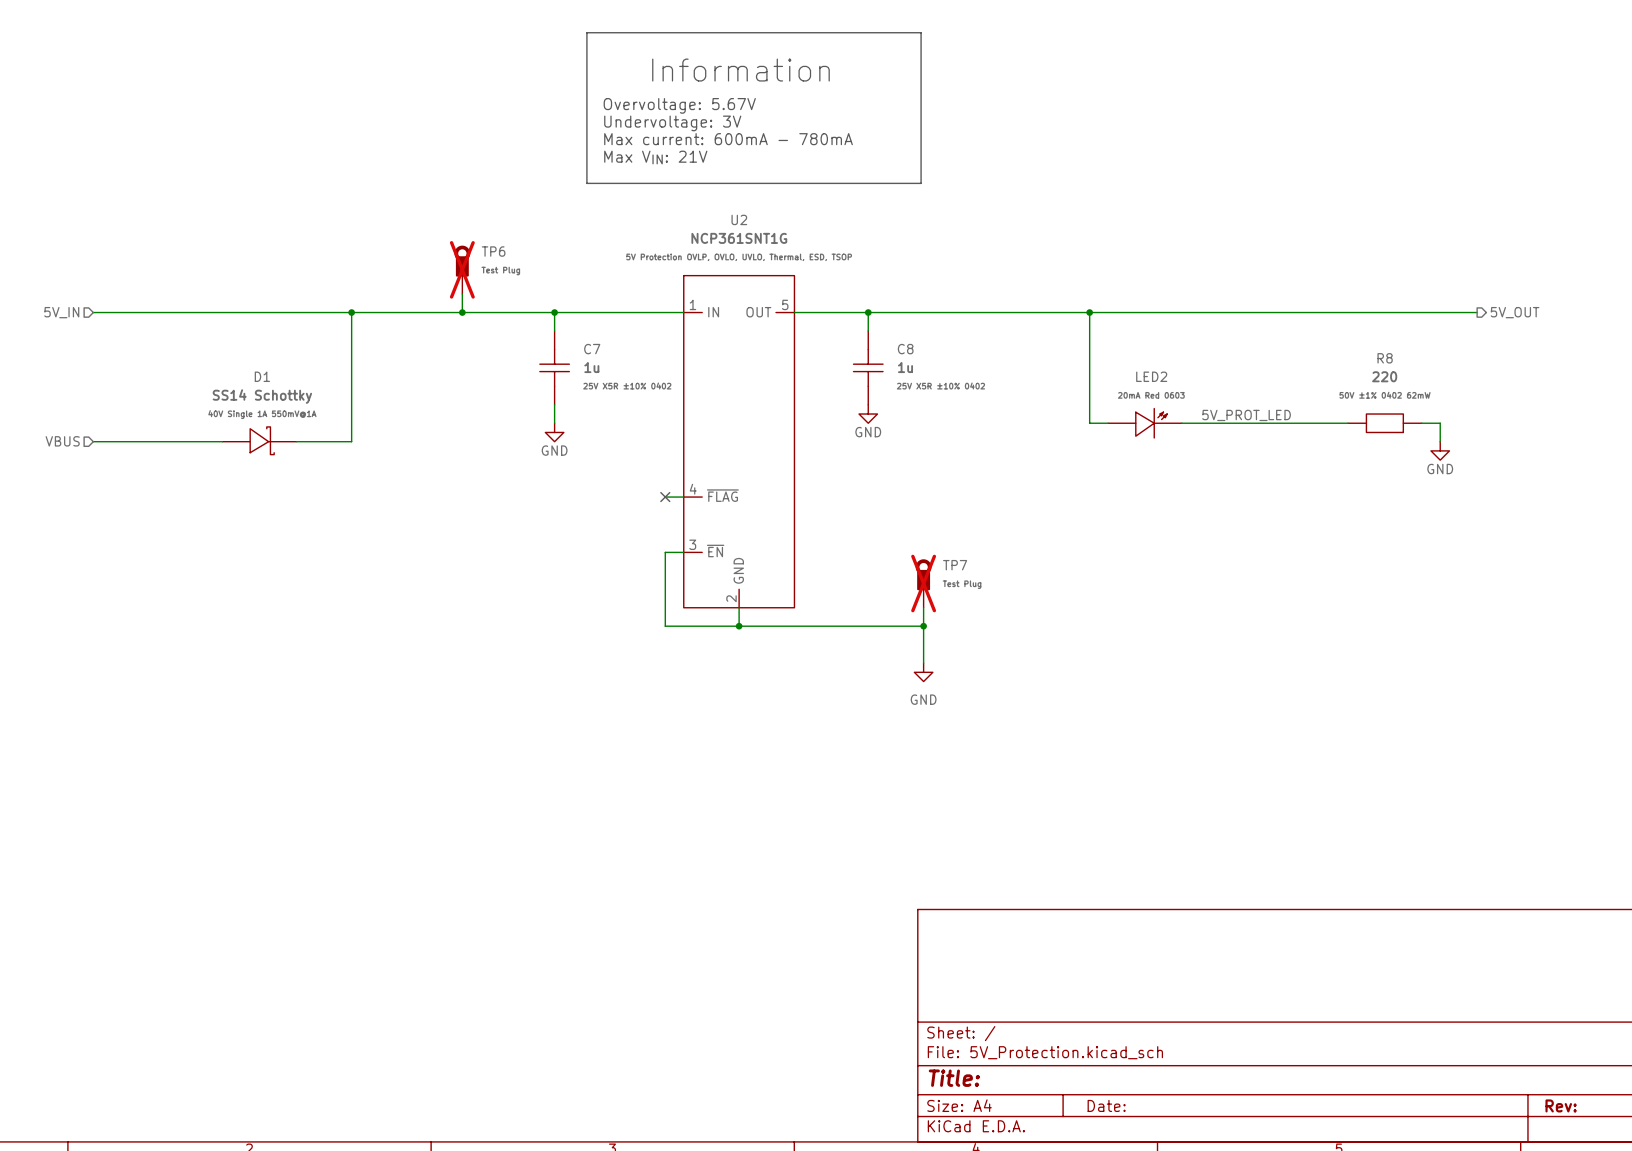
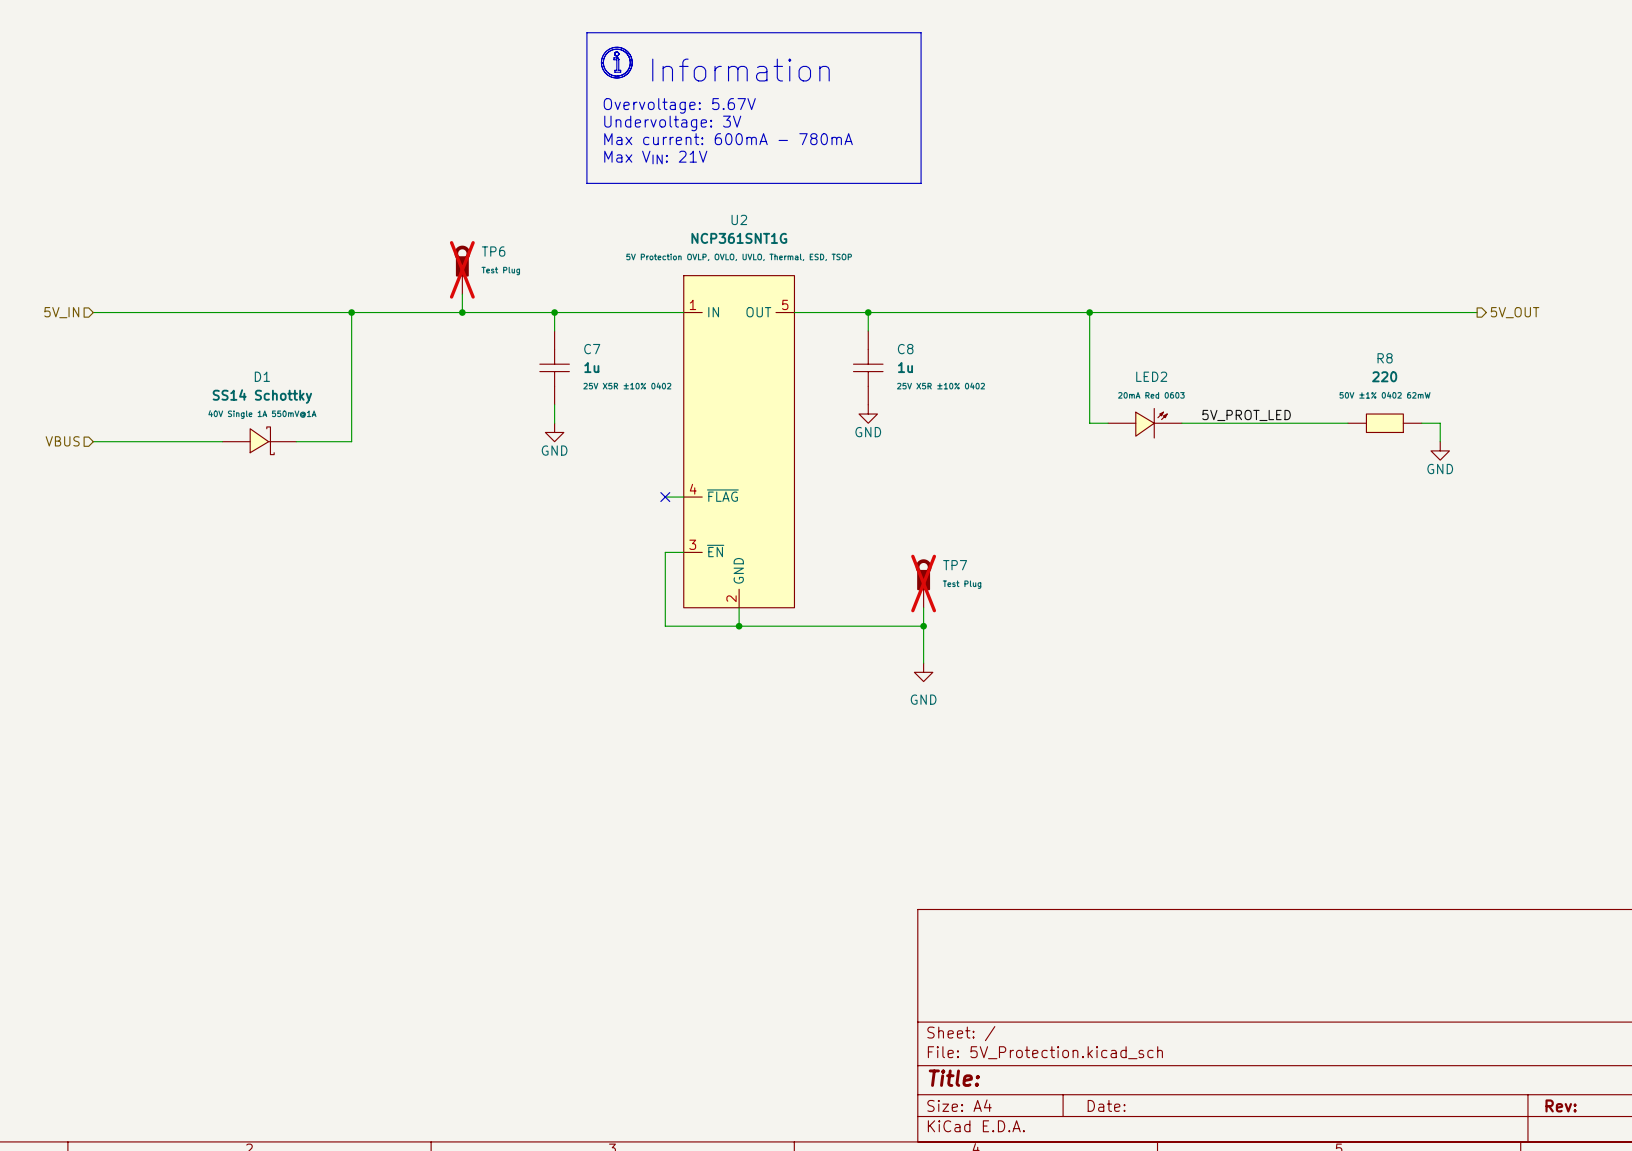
line: none -> (616, 47) (605, 52) (601, 62) (605, 73) (617, 78) (627, 73) (632, 62) (627, 51) (616, 47)
line: none -> (616, 57) (613, 57) (613, 59) (616, 59) (616, 70) (614, 72) (620, 72) (618, 70) (618, 59)
line: none -> (603, 62) (607, 72) (617, 76) (626, 71) (630, 62) (625, 52) (616, 49) (607, 53) (603, 62)

